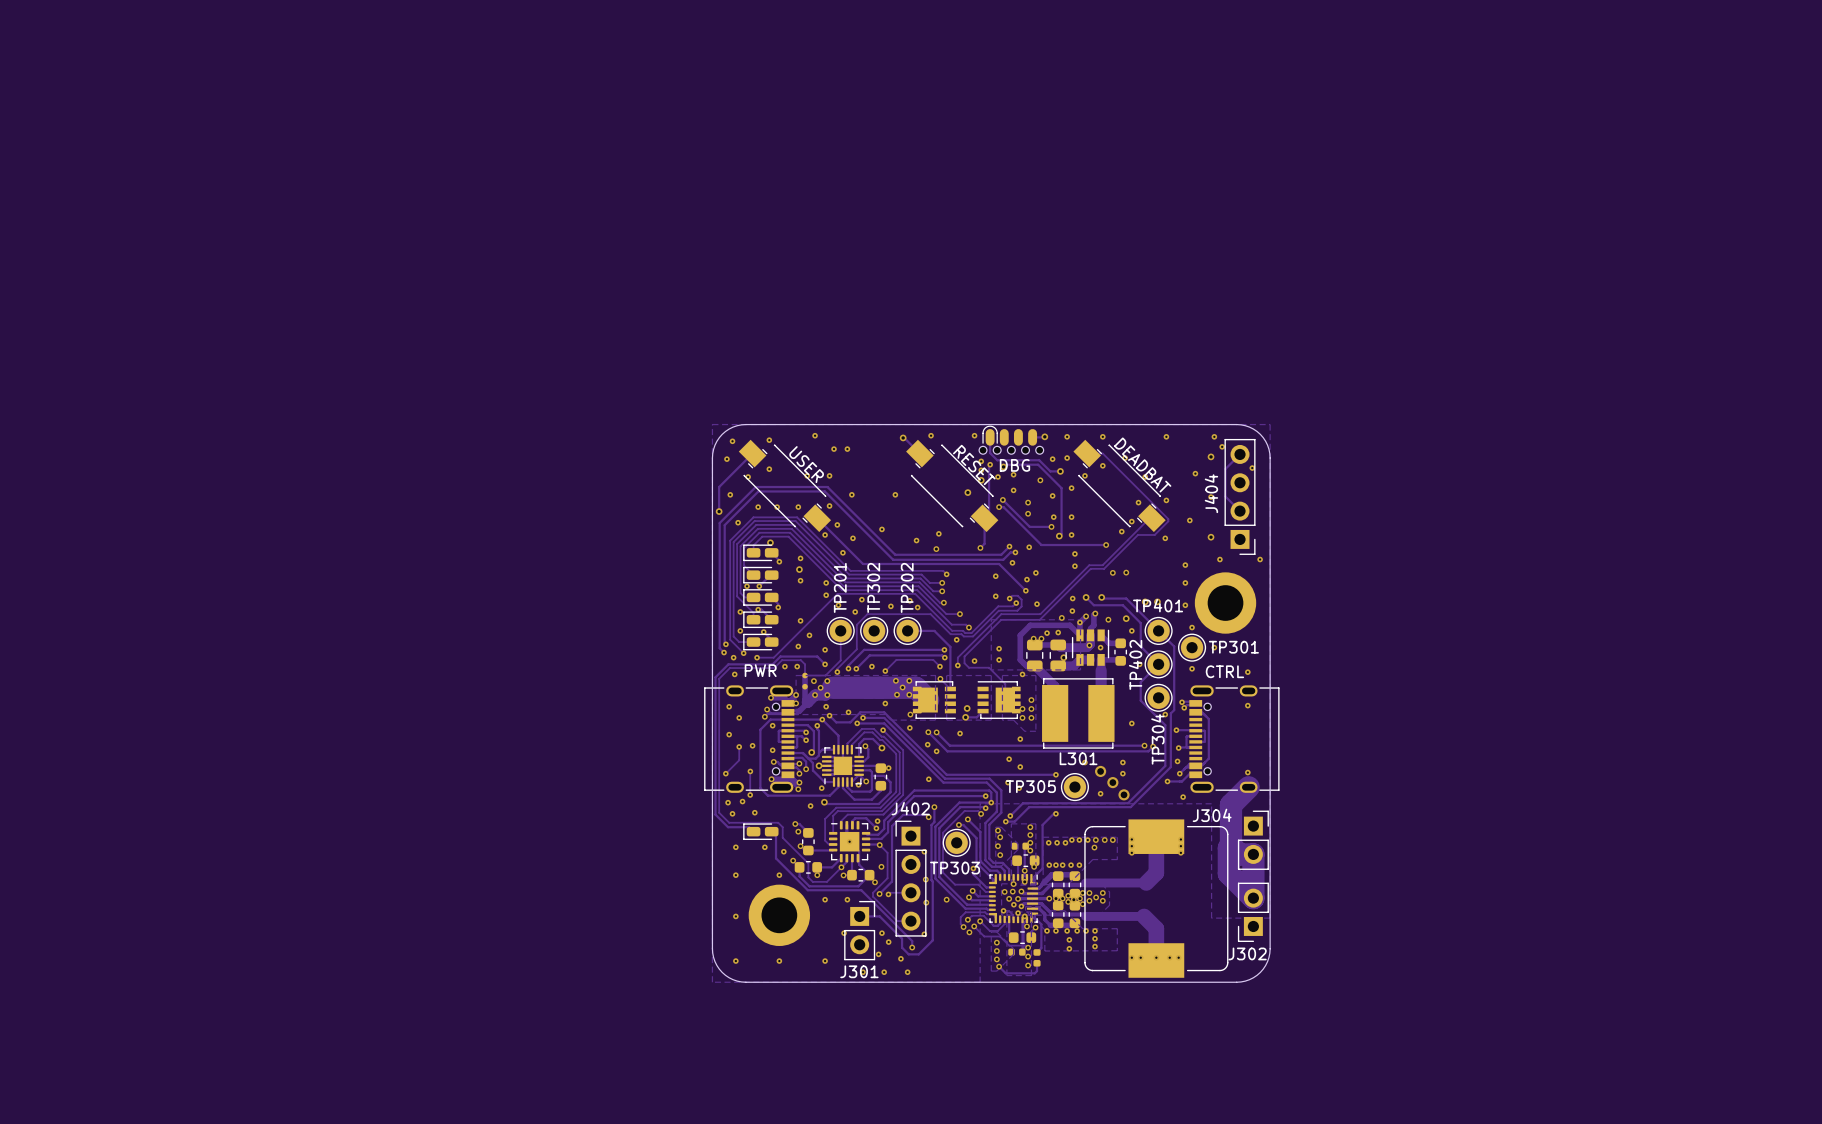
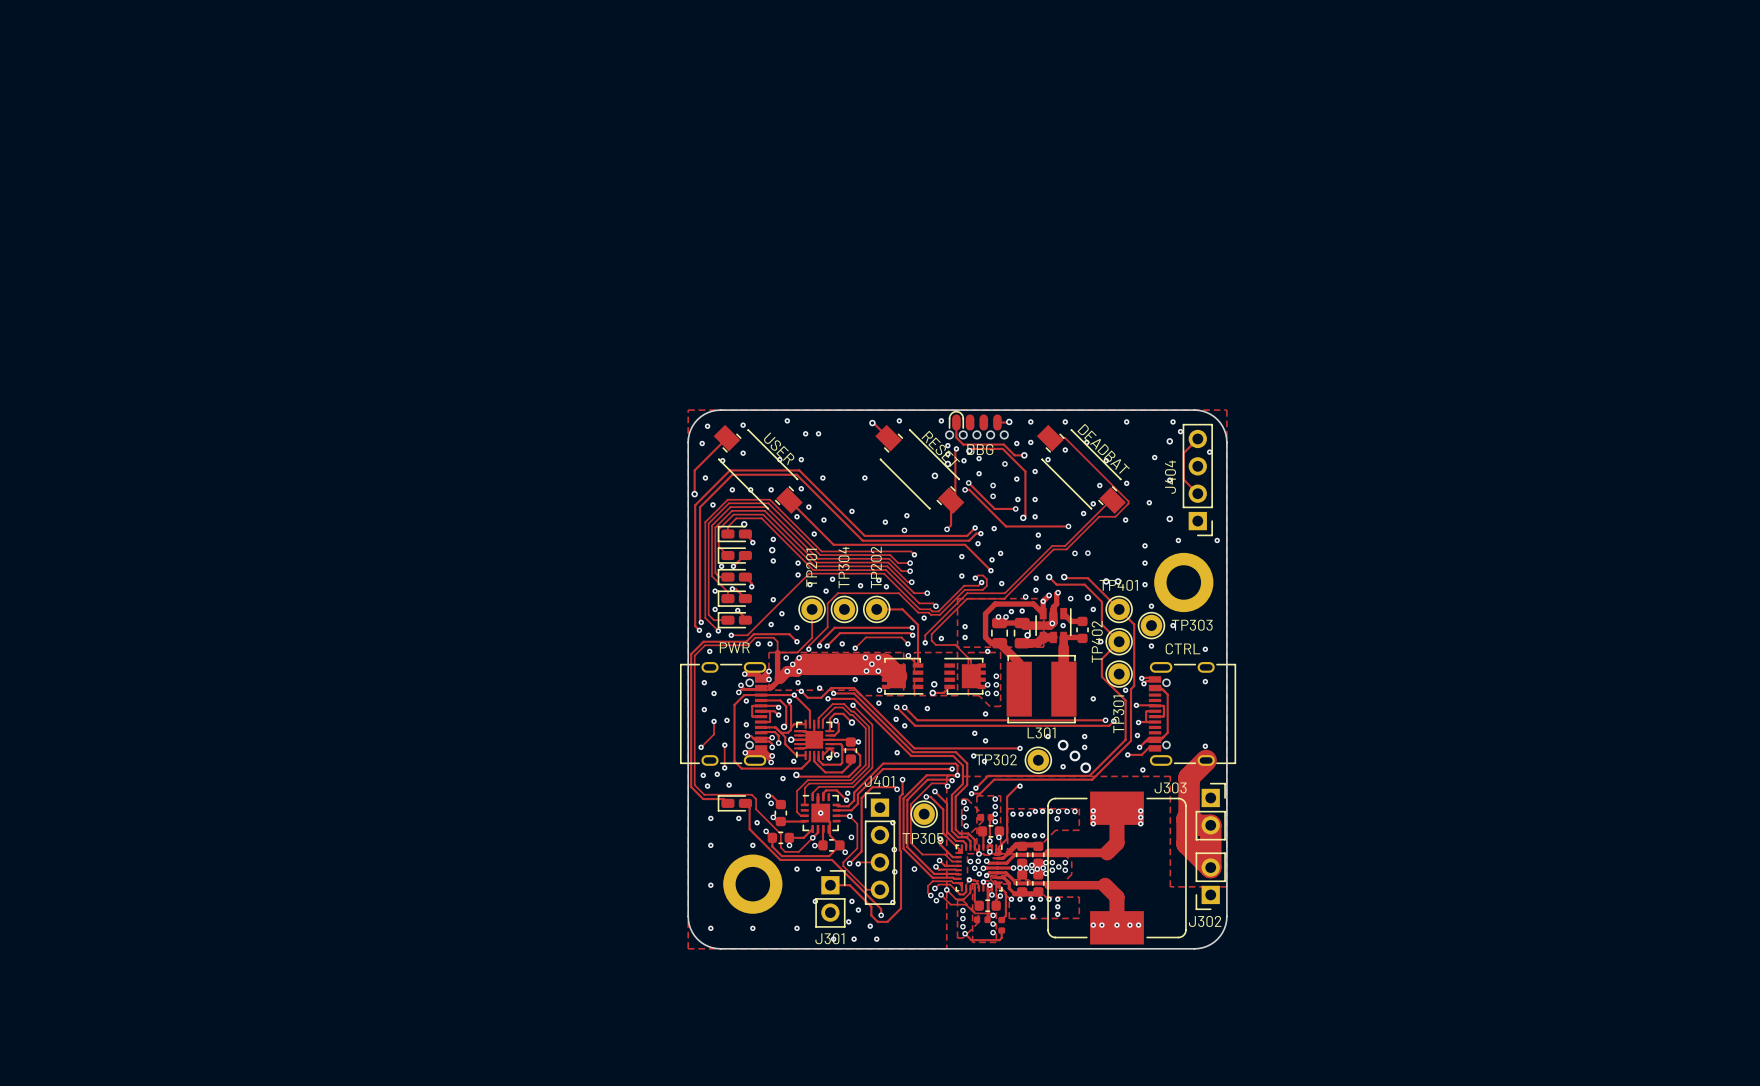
TP302 name: TP302 (873, 587) -> TP304 (844, 567)
TP301 name: TP301 (1233, 647) -> TP303 (1192, 625)
TP304 name: TP304 (1157, 739) -> TP301 (1118, 714)
TP305 name: TP305 (1030, 786) -> TP302 (996, 759)
J402 name: J402 (910, 808) -> J401 (879, 781)
J304 name: J304 (1212, 815) -> J303 (1170, 787)
TP303 name: TP303 (955, 868) -> TP305 (923, 838)

